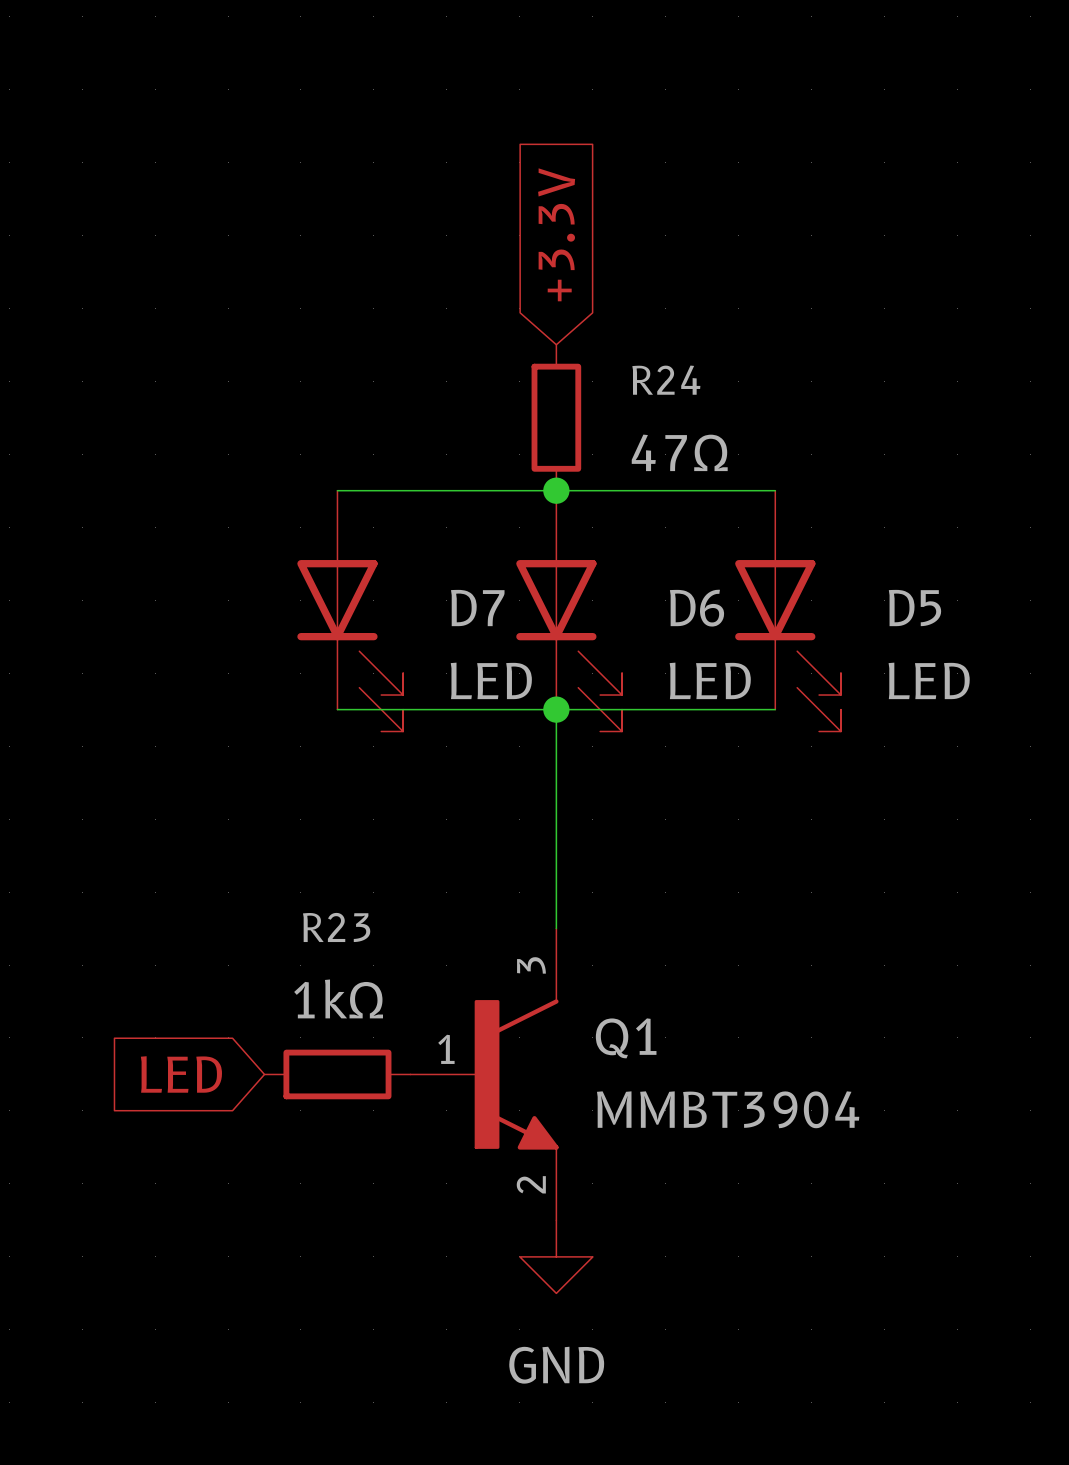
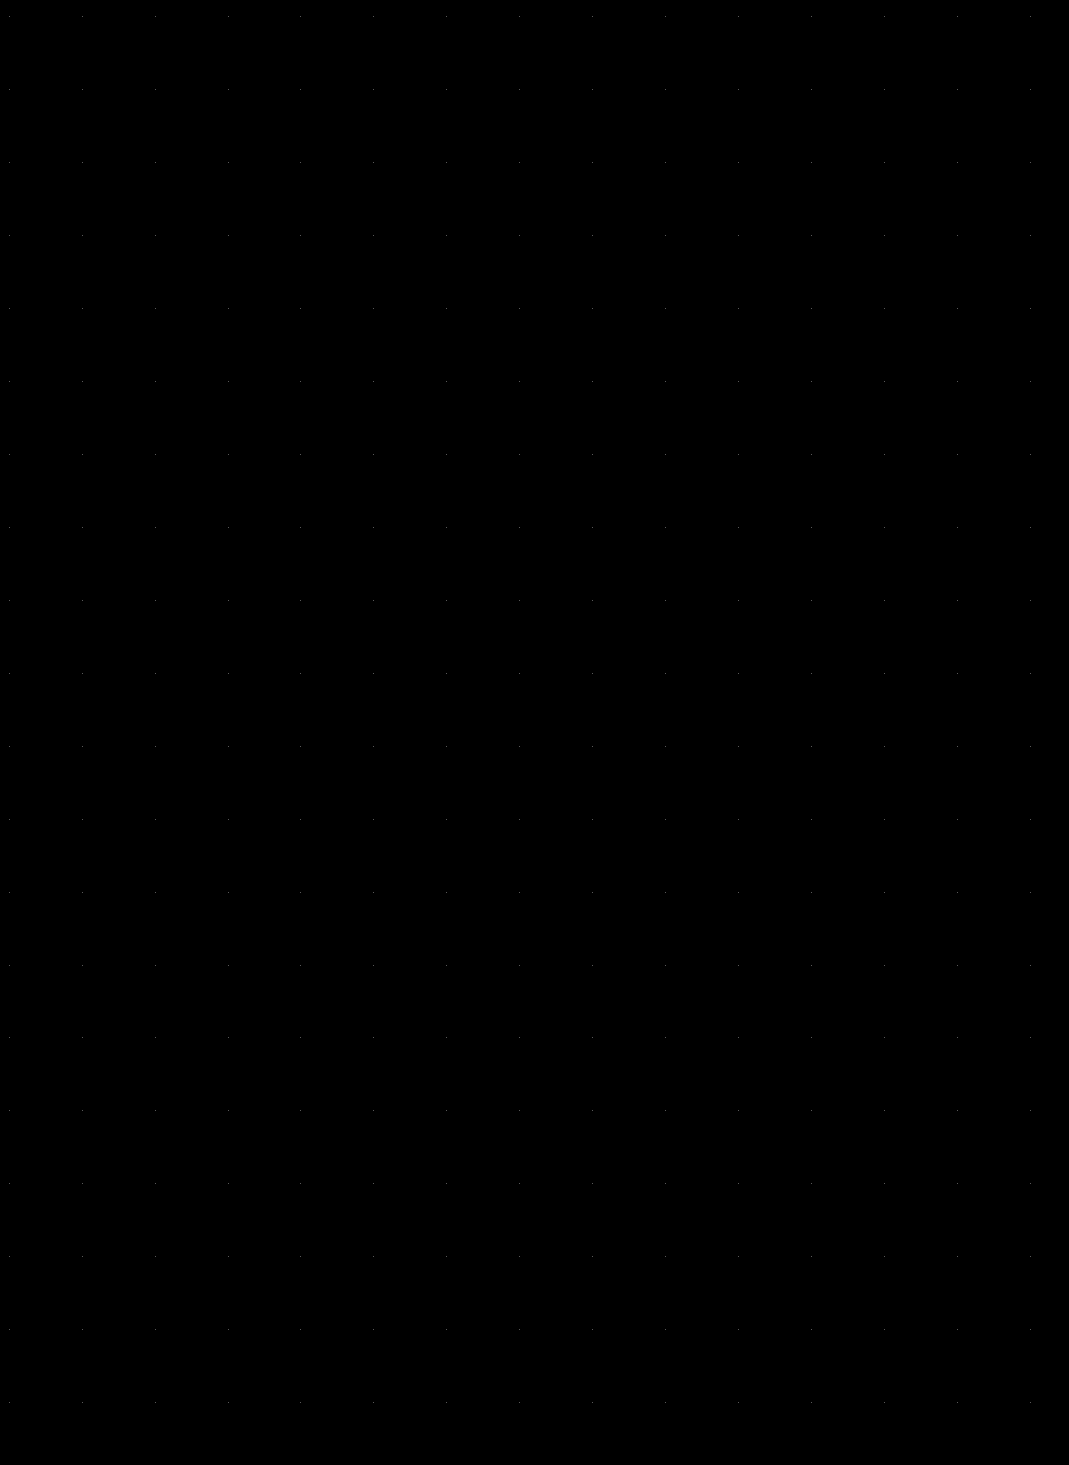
global label: +3.3V (556, 234) -> none
R24: 47Ω (556, 417) -> none
wire: (337, 490) (775, 490) -> none
junction: (556, 490) -> none
D7: LED (350, 611) -> none
D6: LED (569, 611) -> none
D5: LED (788, 611) -> none
wire: (337, 709) (775, 709) -> none
wire: (556, 709) (556, 928) -> none
junction: (556, 709) -> none
global label: LED (181, 1074) -> none
R23: 1kΩ (337, 1074) -> none
Q1: MMBT3904 (484, 1074) -> none
power symbol: GND (556, 1256) -> none

